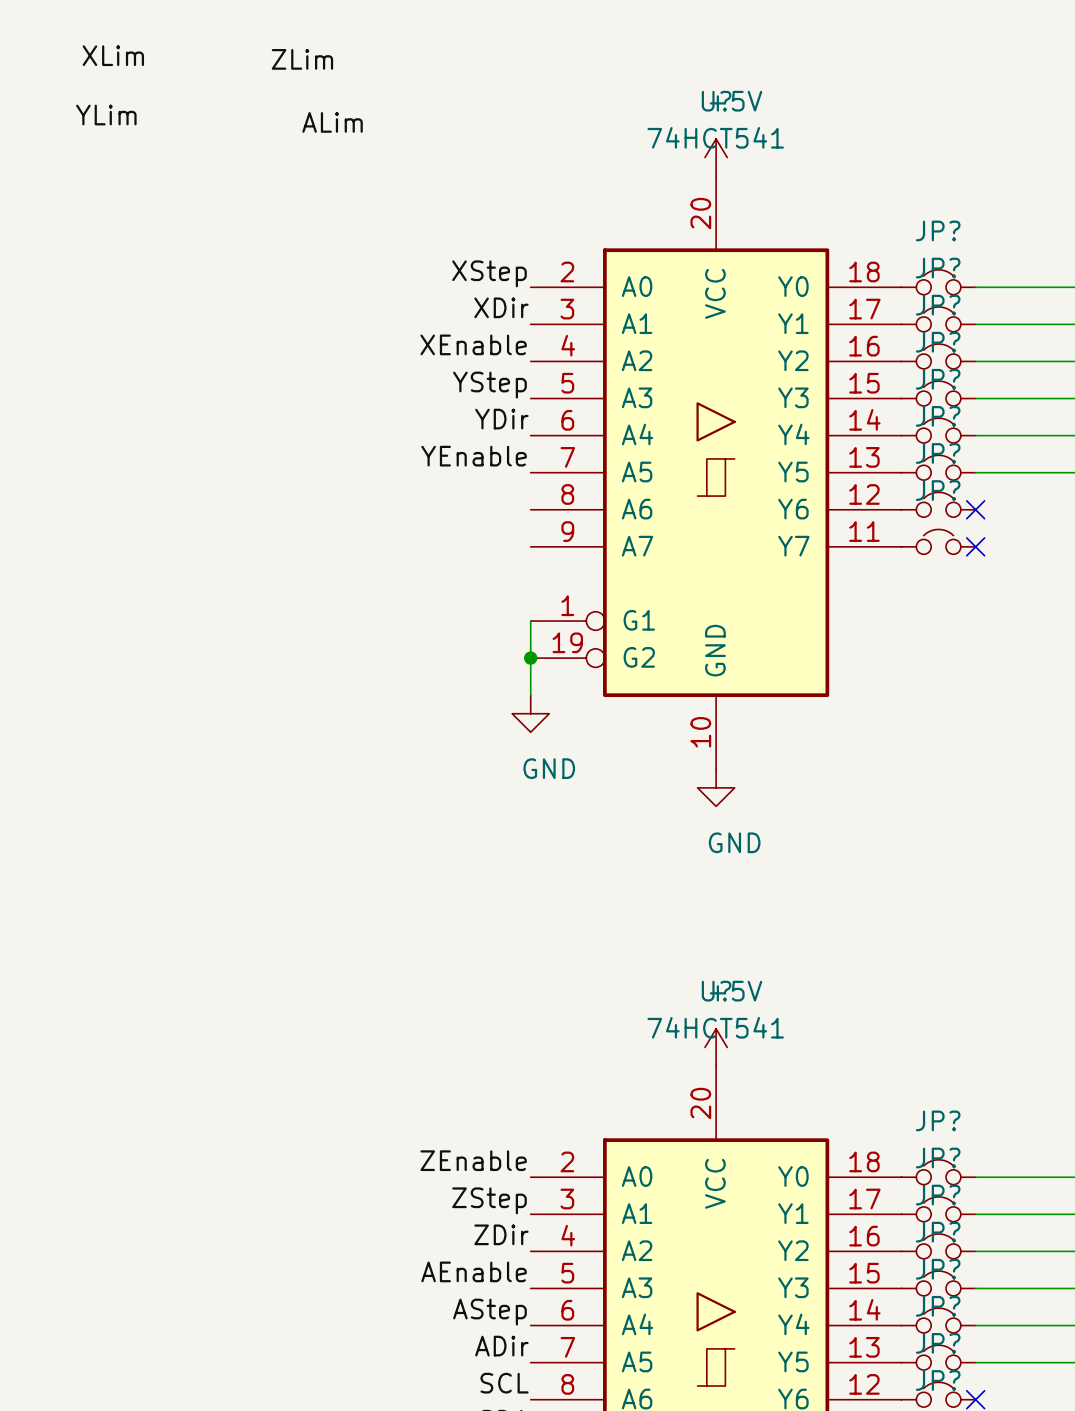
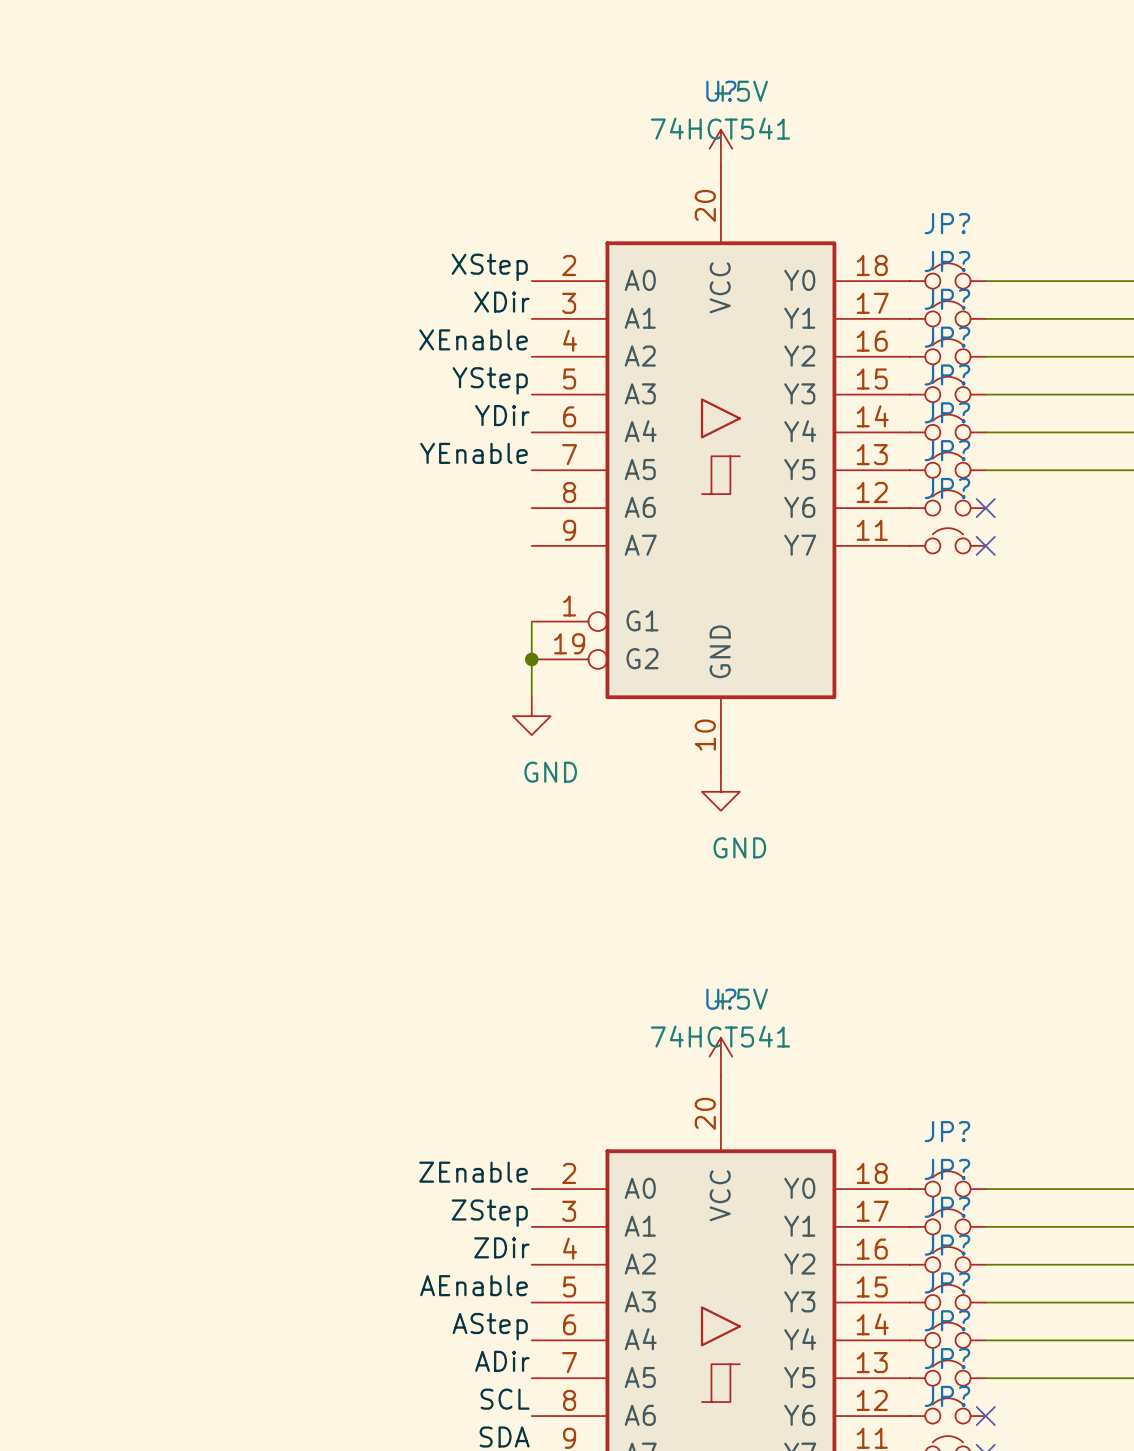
label: XLim (113, 55) -> none
label: ZLim (302, 59) -> none
label: YLim (106, 115) -> none
label: ALim (332, 122) -> none

